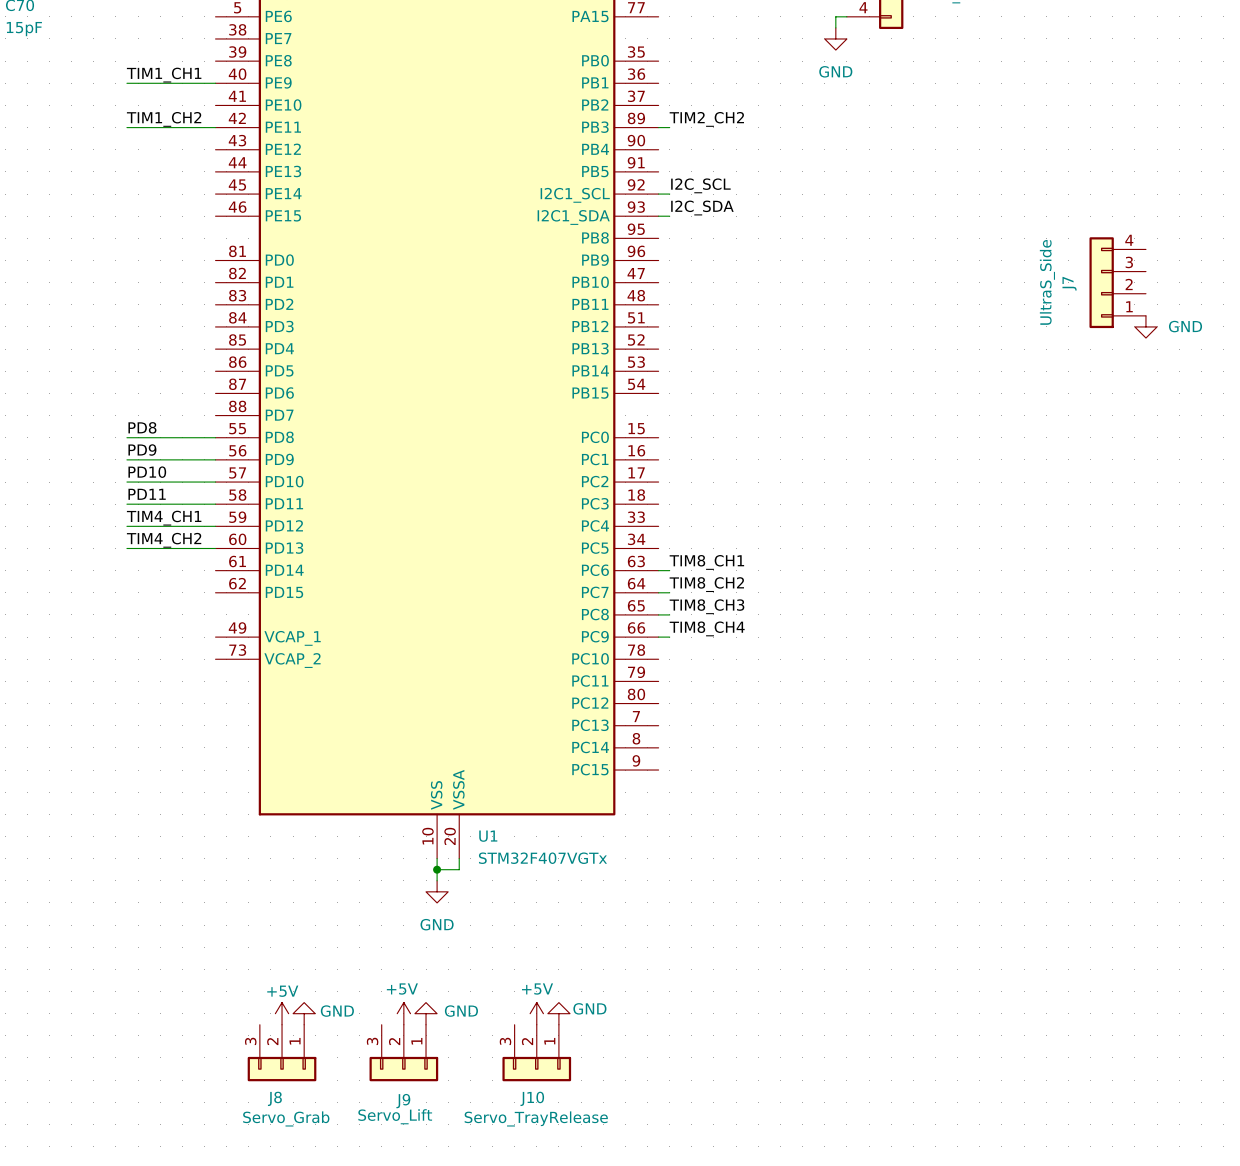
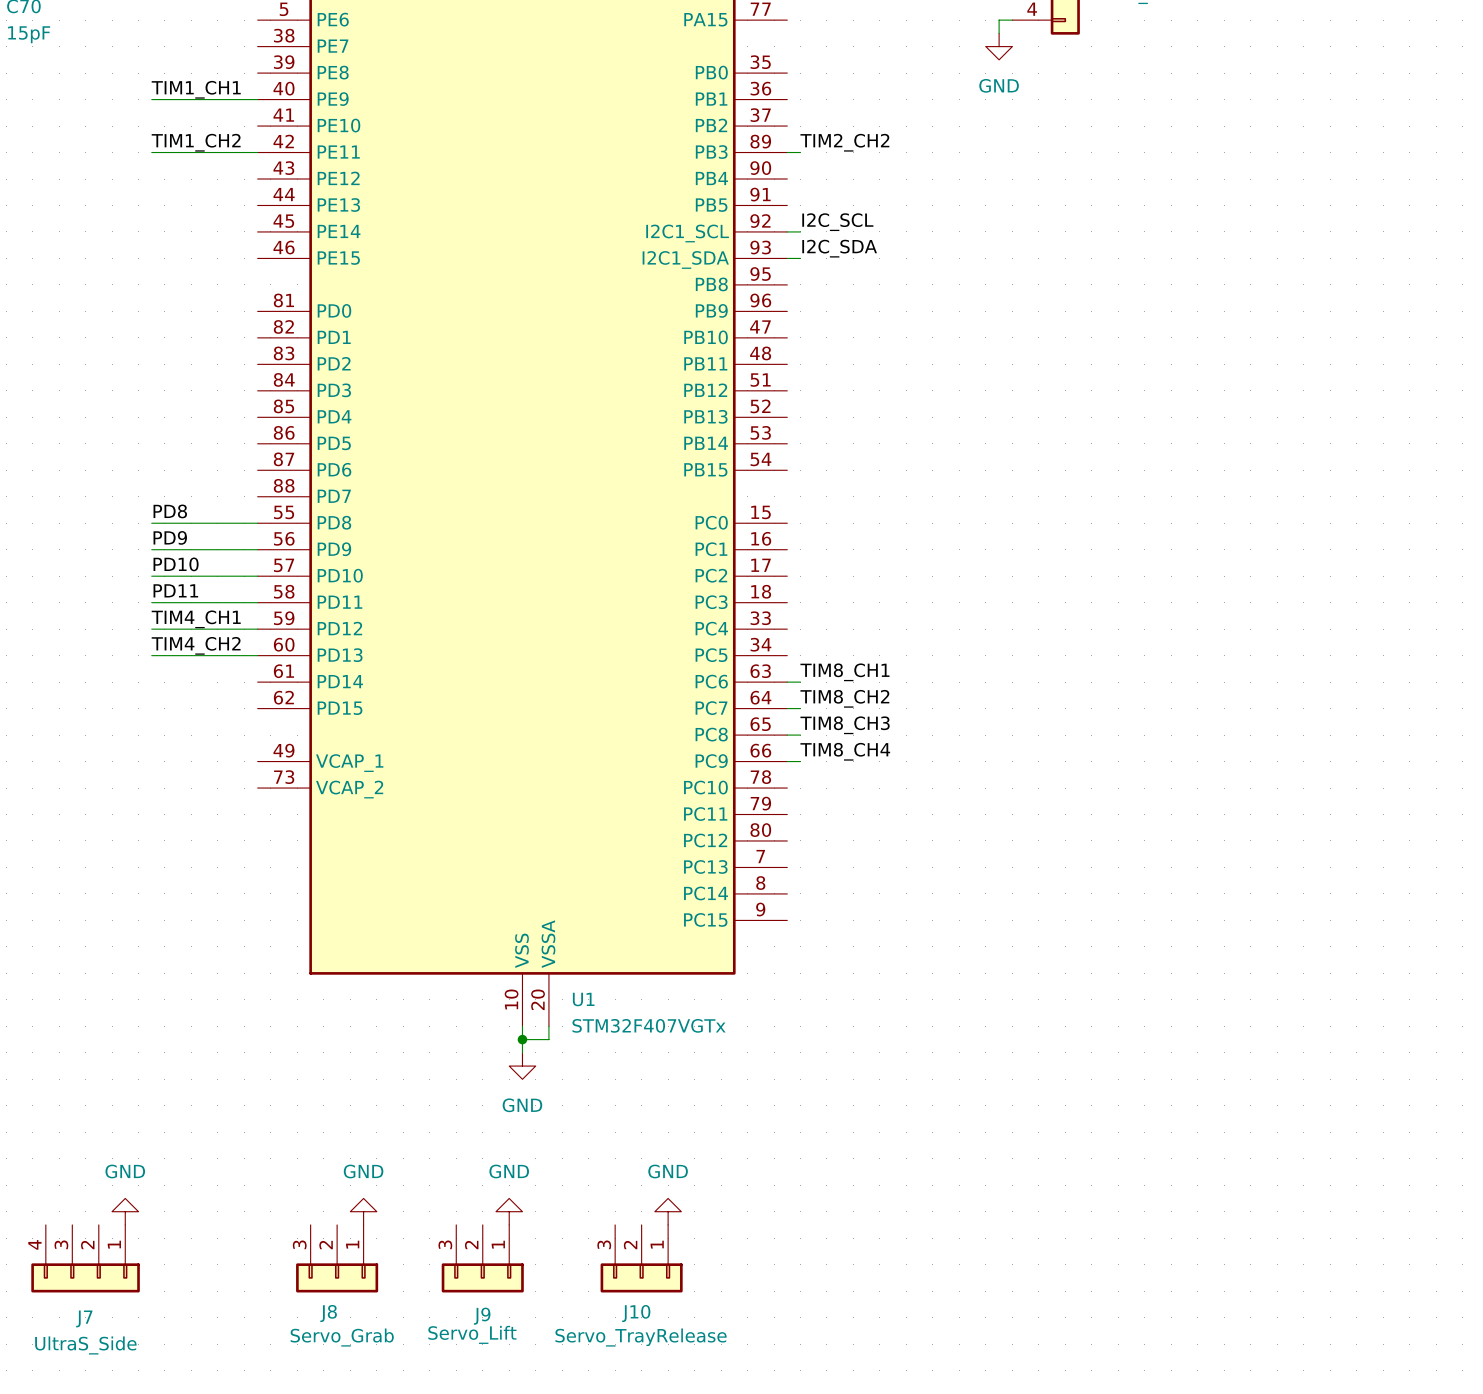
J7 rotation: 0° (1101, 282) -> 90° counterclockwise (85, 1277)
J7 position: (1117, 282) -> (85, 1258)
power symbol: GND (1145, 326) -> none
power symbol text position: GND (589, 1008) -> GND (668, 1171)
power symbol text position: GND (337, 1011) -> GND (363, 1171)
power symbol text position: GND (461, 1011) -> GND (509, 1171)
power symbol: none -> GND (125, 1211)
power symbol: +5V (282, 1013) -> none
power symbol: +5V (403, 1013) -> none
power symbol: +5V (536, 1013) -> none

